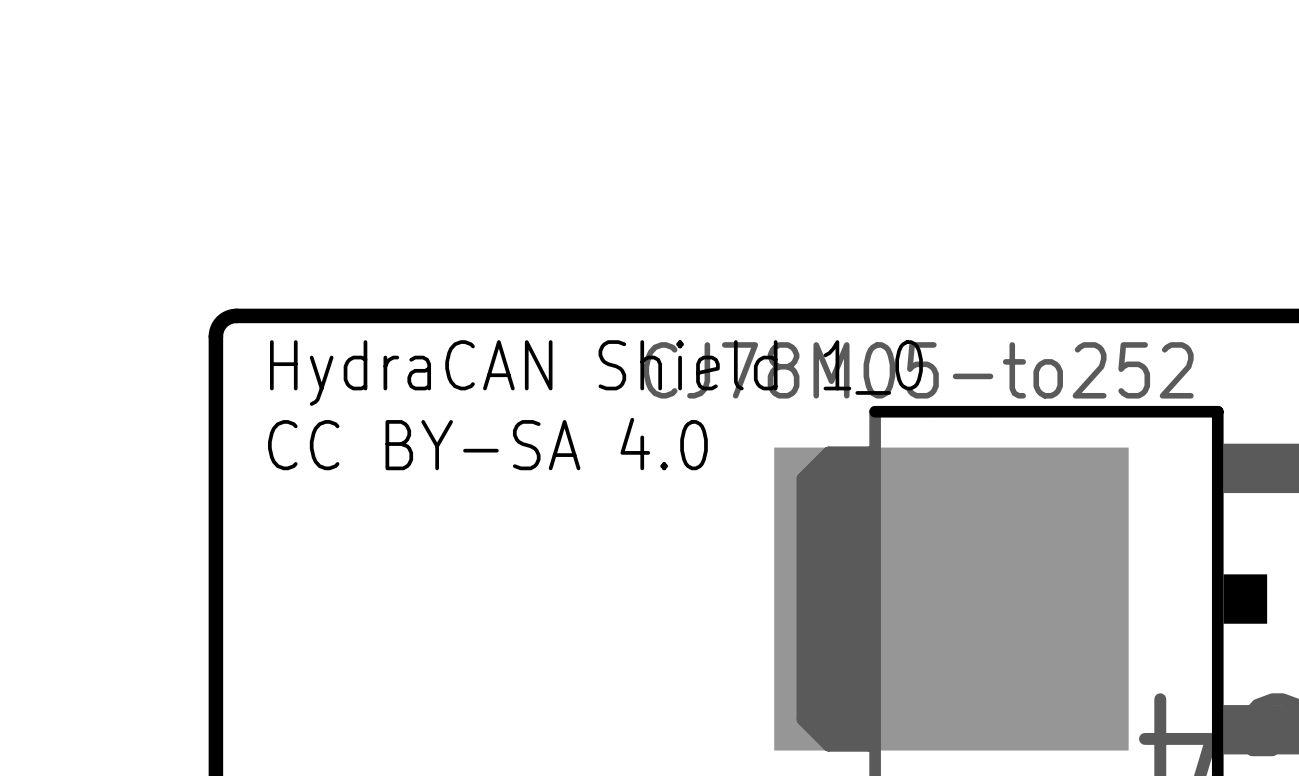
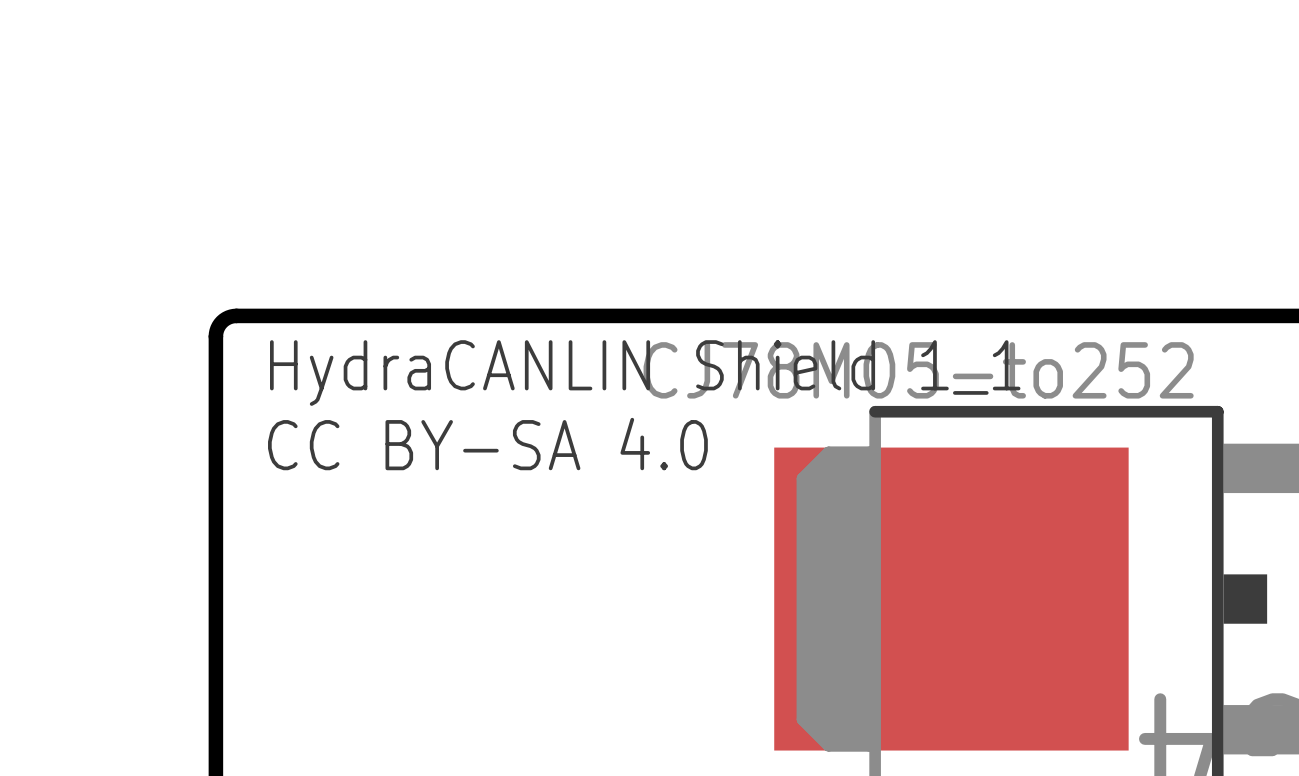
text: HydraCAN Shield 1_0 (596, 373) -> HydraCANLIN Shield 1_1 (645, 373)

